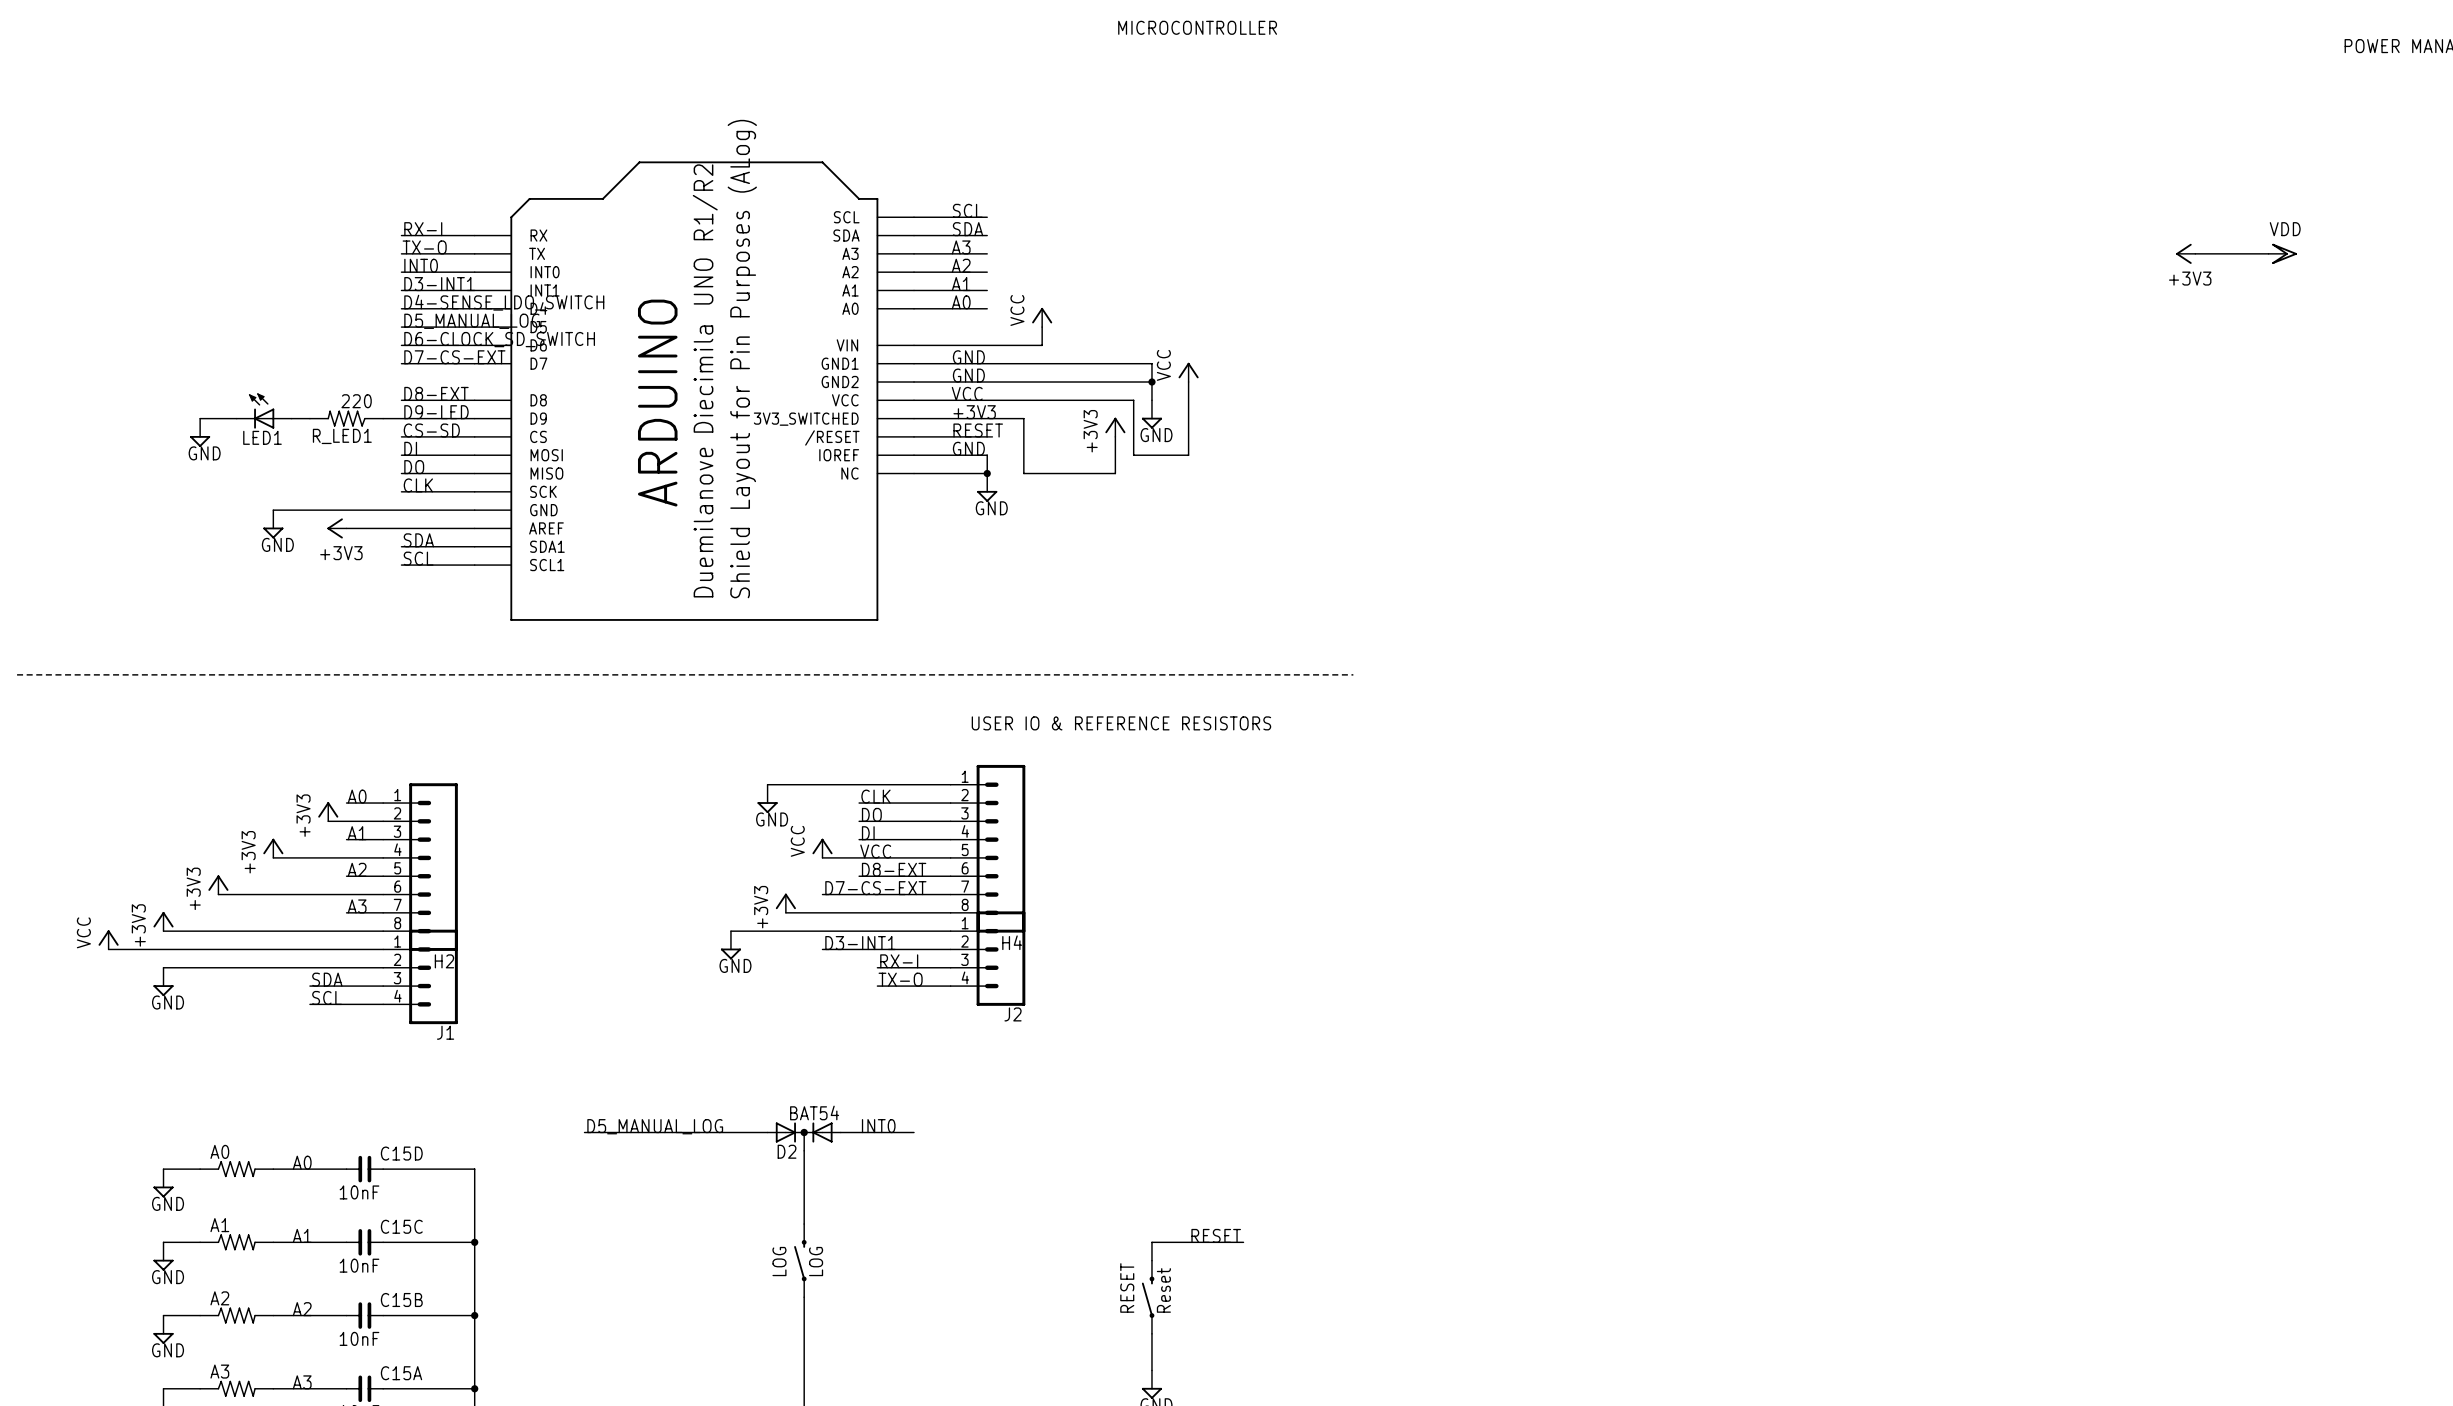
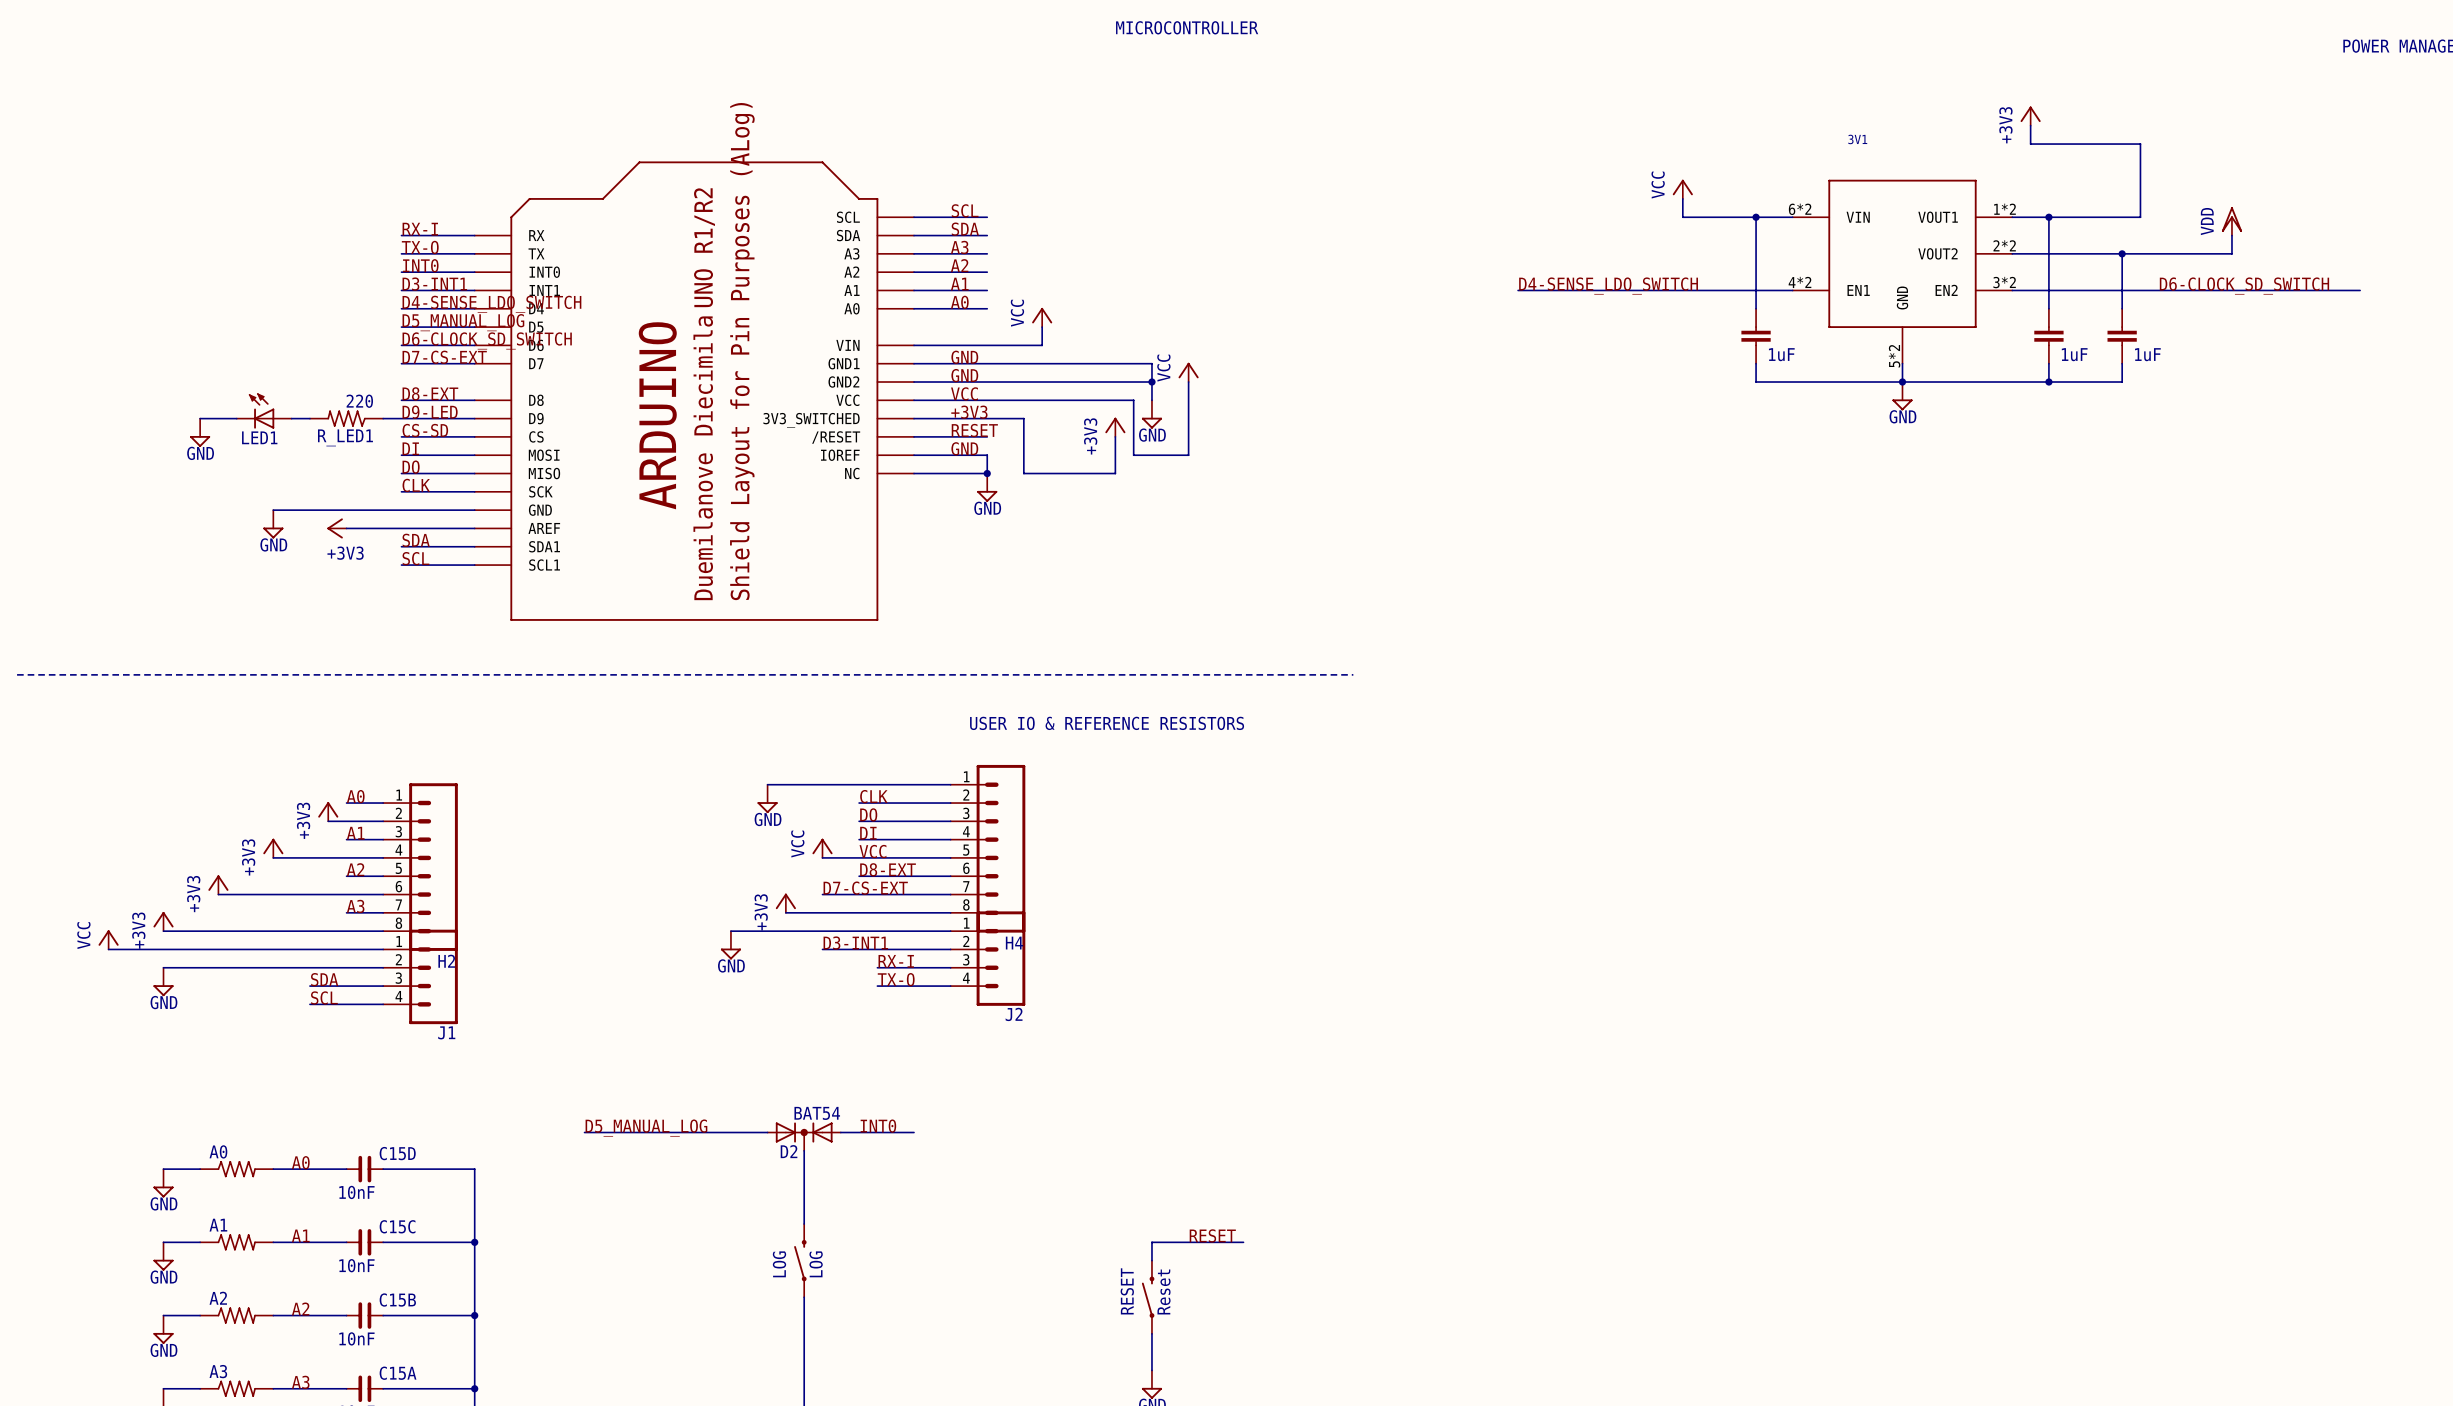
power symbol: none -> +3V3 (2030, 116)
wire: none -> (2030, 125) (2030, 144) (2140, 144) (2140, 217) (2012, 217)
power symbol: none -> VCC (1682, 189)
wire: none -> (1682, 198) (1682, 217) (1792, 217)
wire: none -> (1756, 217) (1756, 308)
junction: none -> (1756, 217)
wire: none -> (2048, 217) (2048, 308)
junction: none -> (2048, 217)
wire: none -> (2012, 253) (2195, 253)
wire: none -> (2122, 253) (2122, 308)
junction: none -> (2122, 253)
power symbol: +3V3 (2185, 253) -> none
wire: (2231, 253) (2268, 253) -> (2231, 253) (2231, 235)
power symbol position: VDD (2282, 253) -> VDD (2231, 221)
power symbol rotation: 0° (2284, 253) -> 90° counterclockwise (2231, 219)
3V1: none -> (1902, 271)
label: none -> D4-SENSE_LDO_SWITCH (1608, 286)
label: none -> D6-CLOCK_SD_SWITCH (2244, 286)
wire: none -> (1518, 290) (1792, 290)
wire: none -> (2012, 290) (2360, 290)
part: none -> 1uF (1756, 336)
part: none -> 1uF (2048, 336)
part: none -> 1uF (2122, 336)
wire: none -> (1756, 363) (1756, 382) (2122, 382) (2122, 363)
wire: none -> (1902, 363) (1902, 382)
wire: none -> (2048, 363) (2048, 382)
junction: none -> (1902, 382)
junction: none -> (2048, 382)
power symbol: none -> GND (1902, 396)

